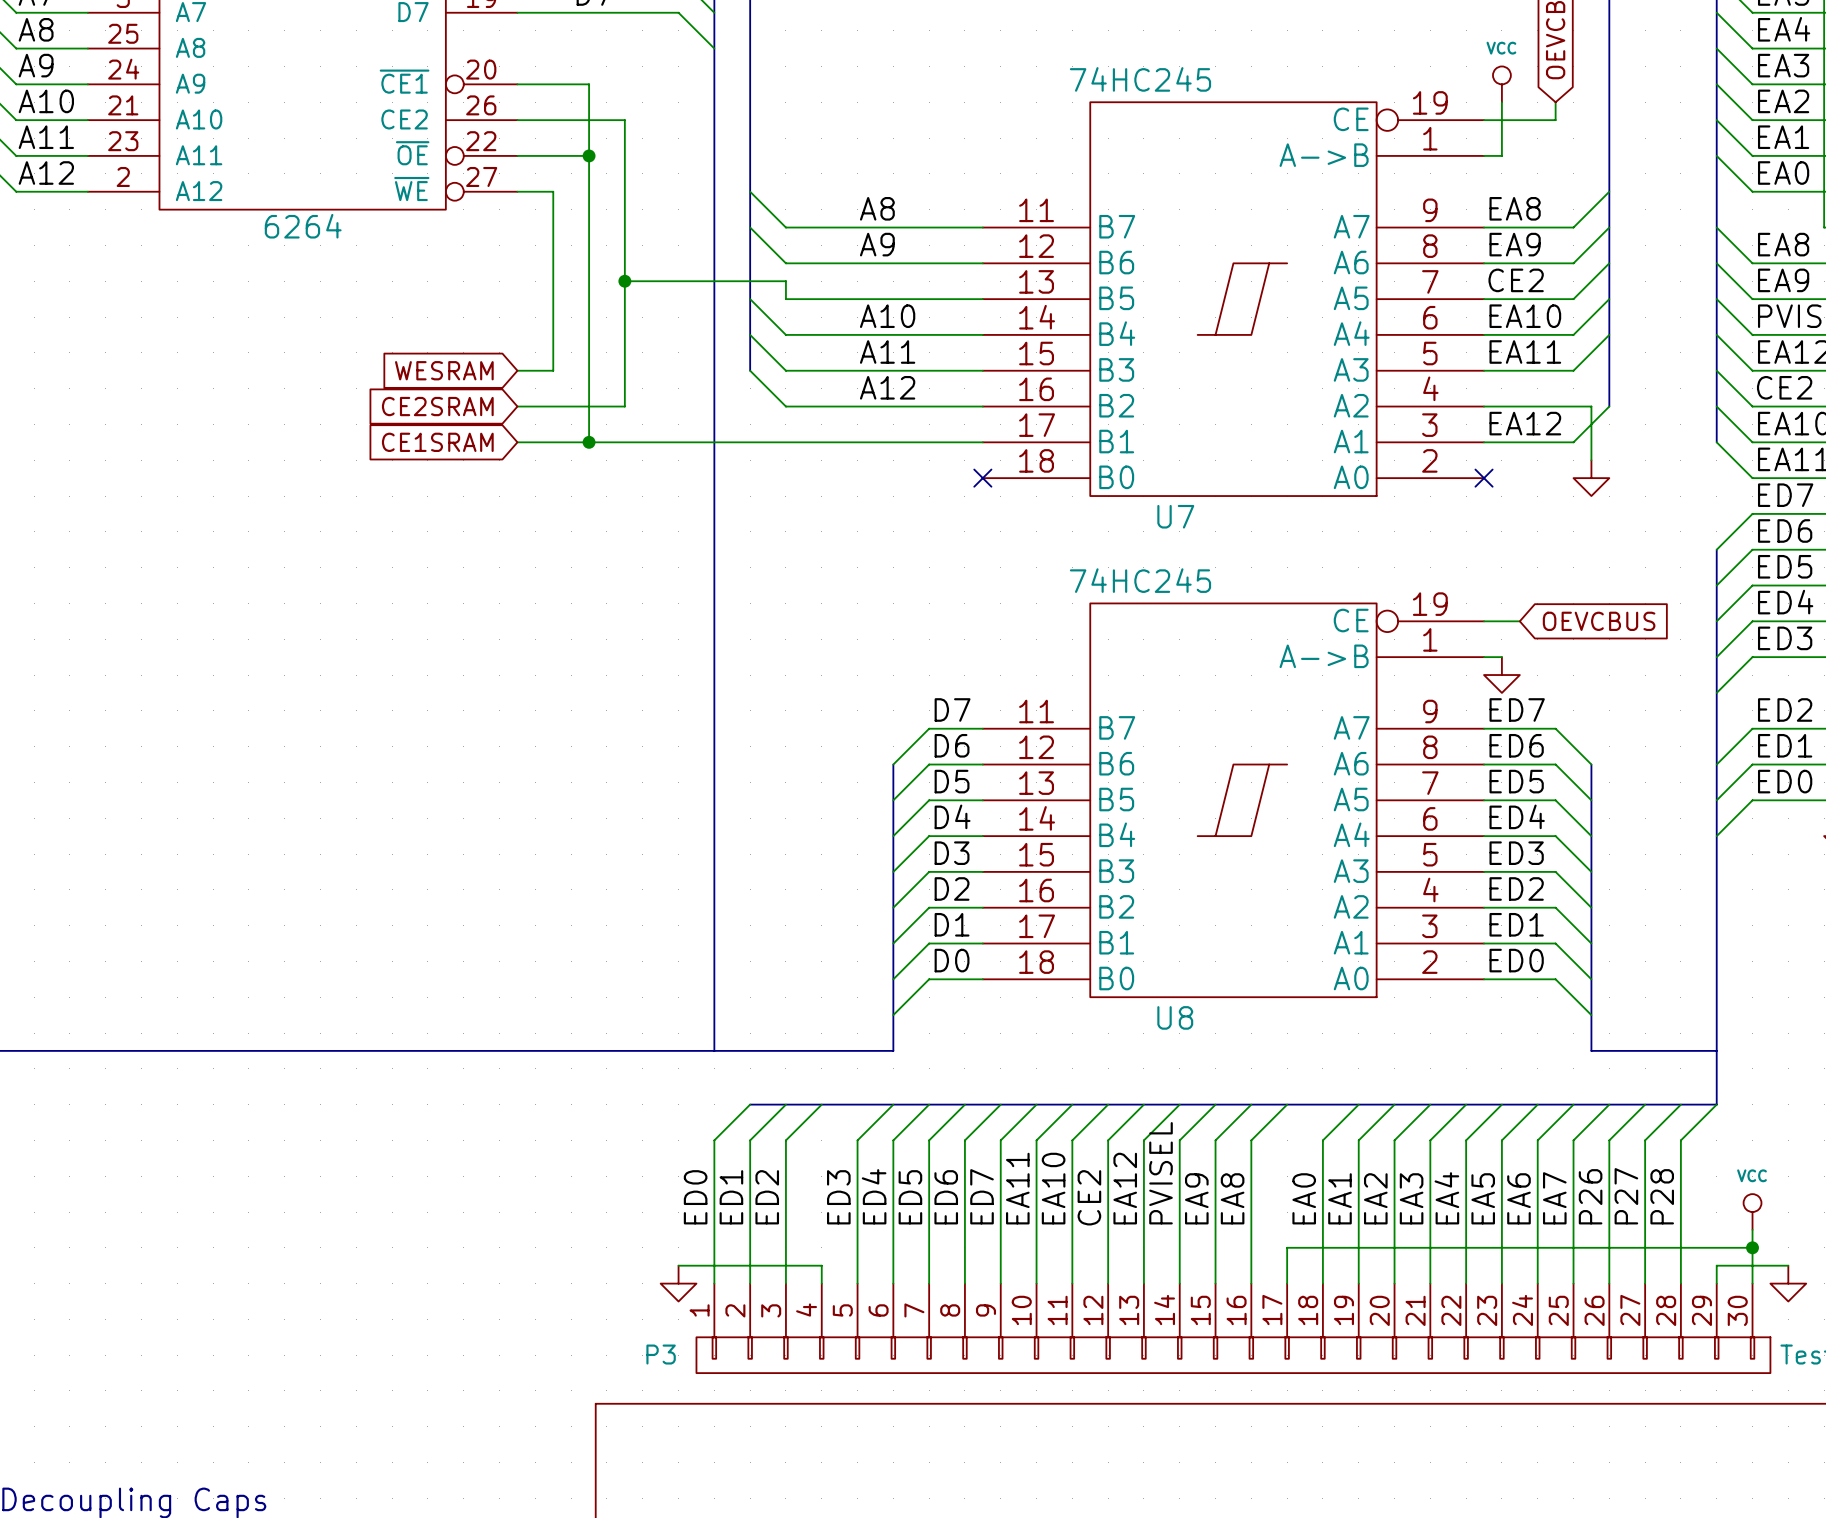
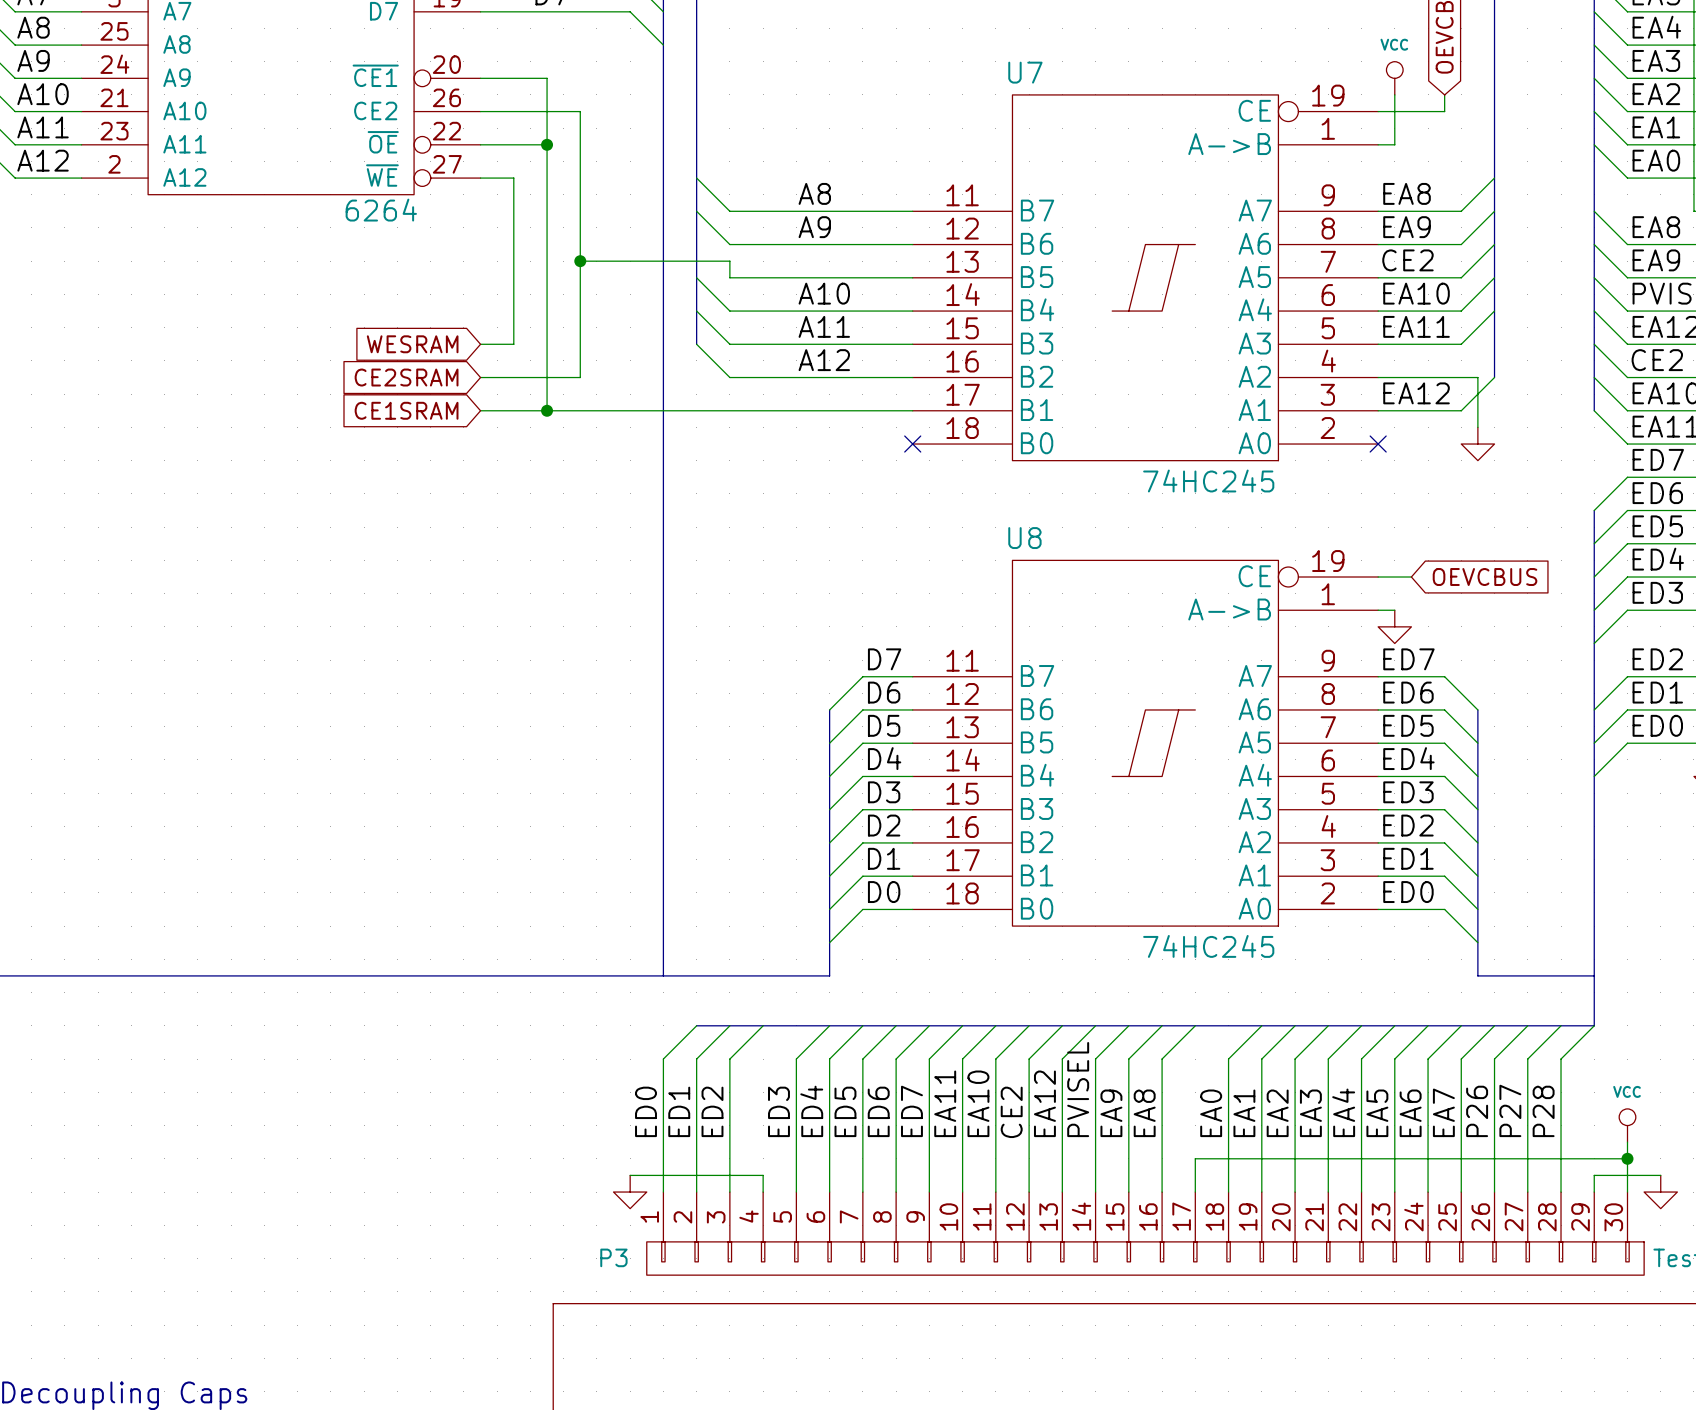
U7 value position: 74HC245 (1140, 79) -> 74HC245 (1208, 481)
part value position: 6264 (303, 226) -> 6264 (381, 210)
U7 name position: U7 (1175, 516) -> U7 (1025, 72)
U8 value position: 74HC245 (1140, 580) -> 74HC245 (1208, 946)
U8 name position: U8 (1175, 1017) -> U8 (1024, 538)

